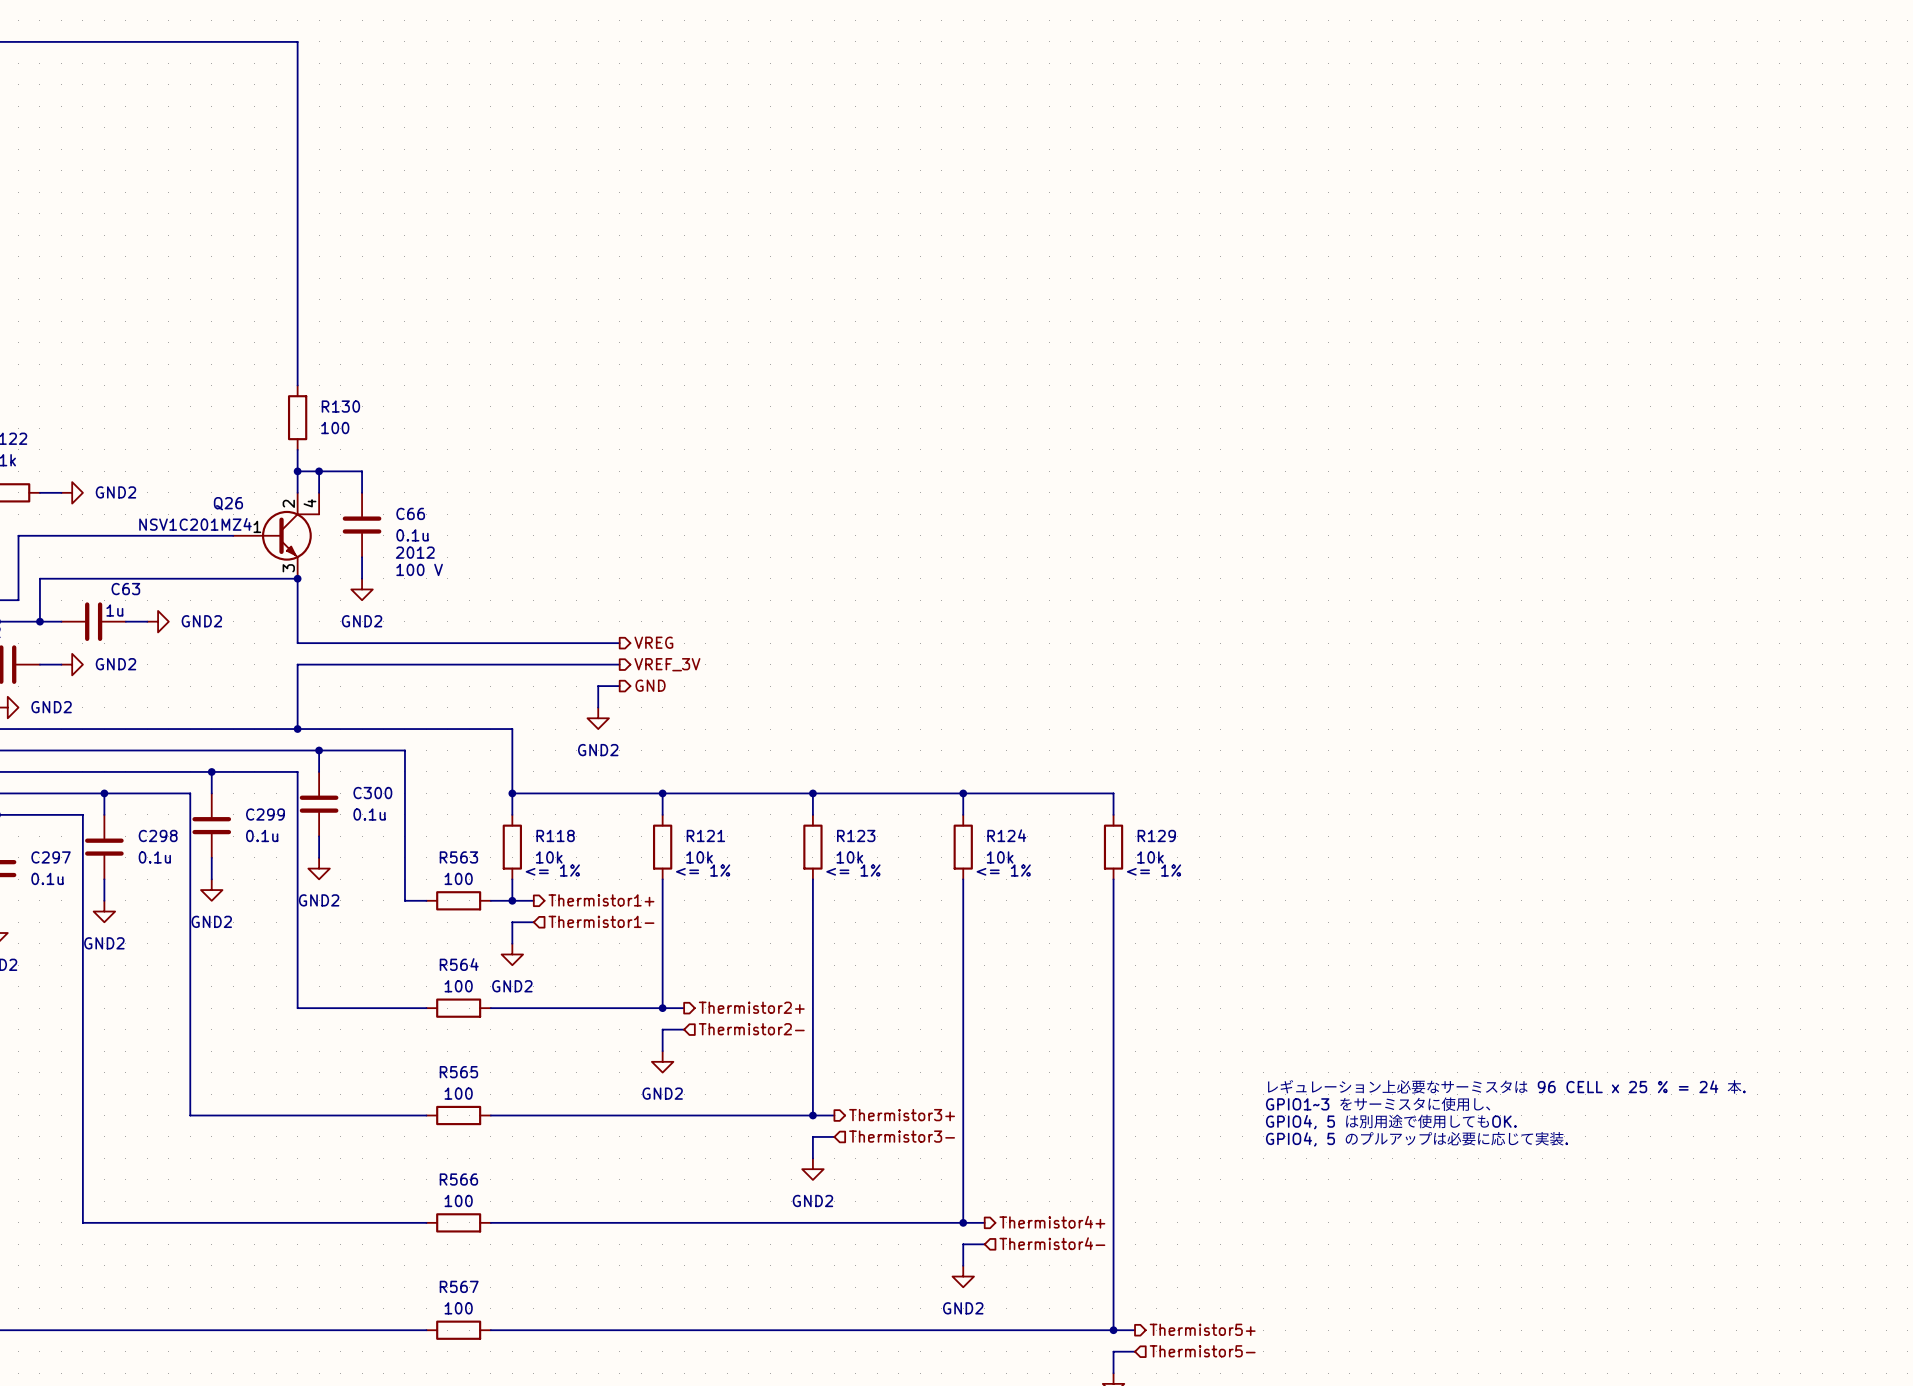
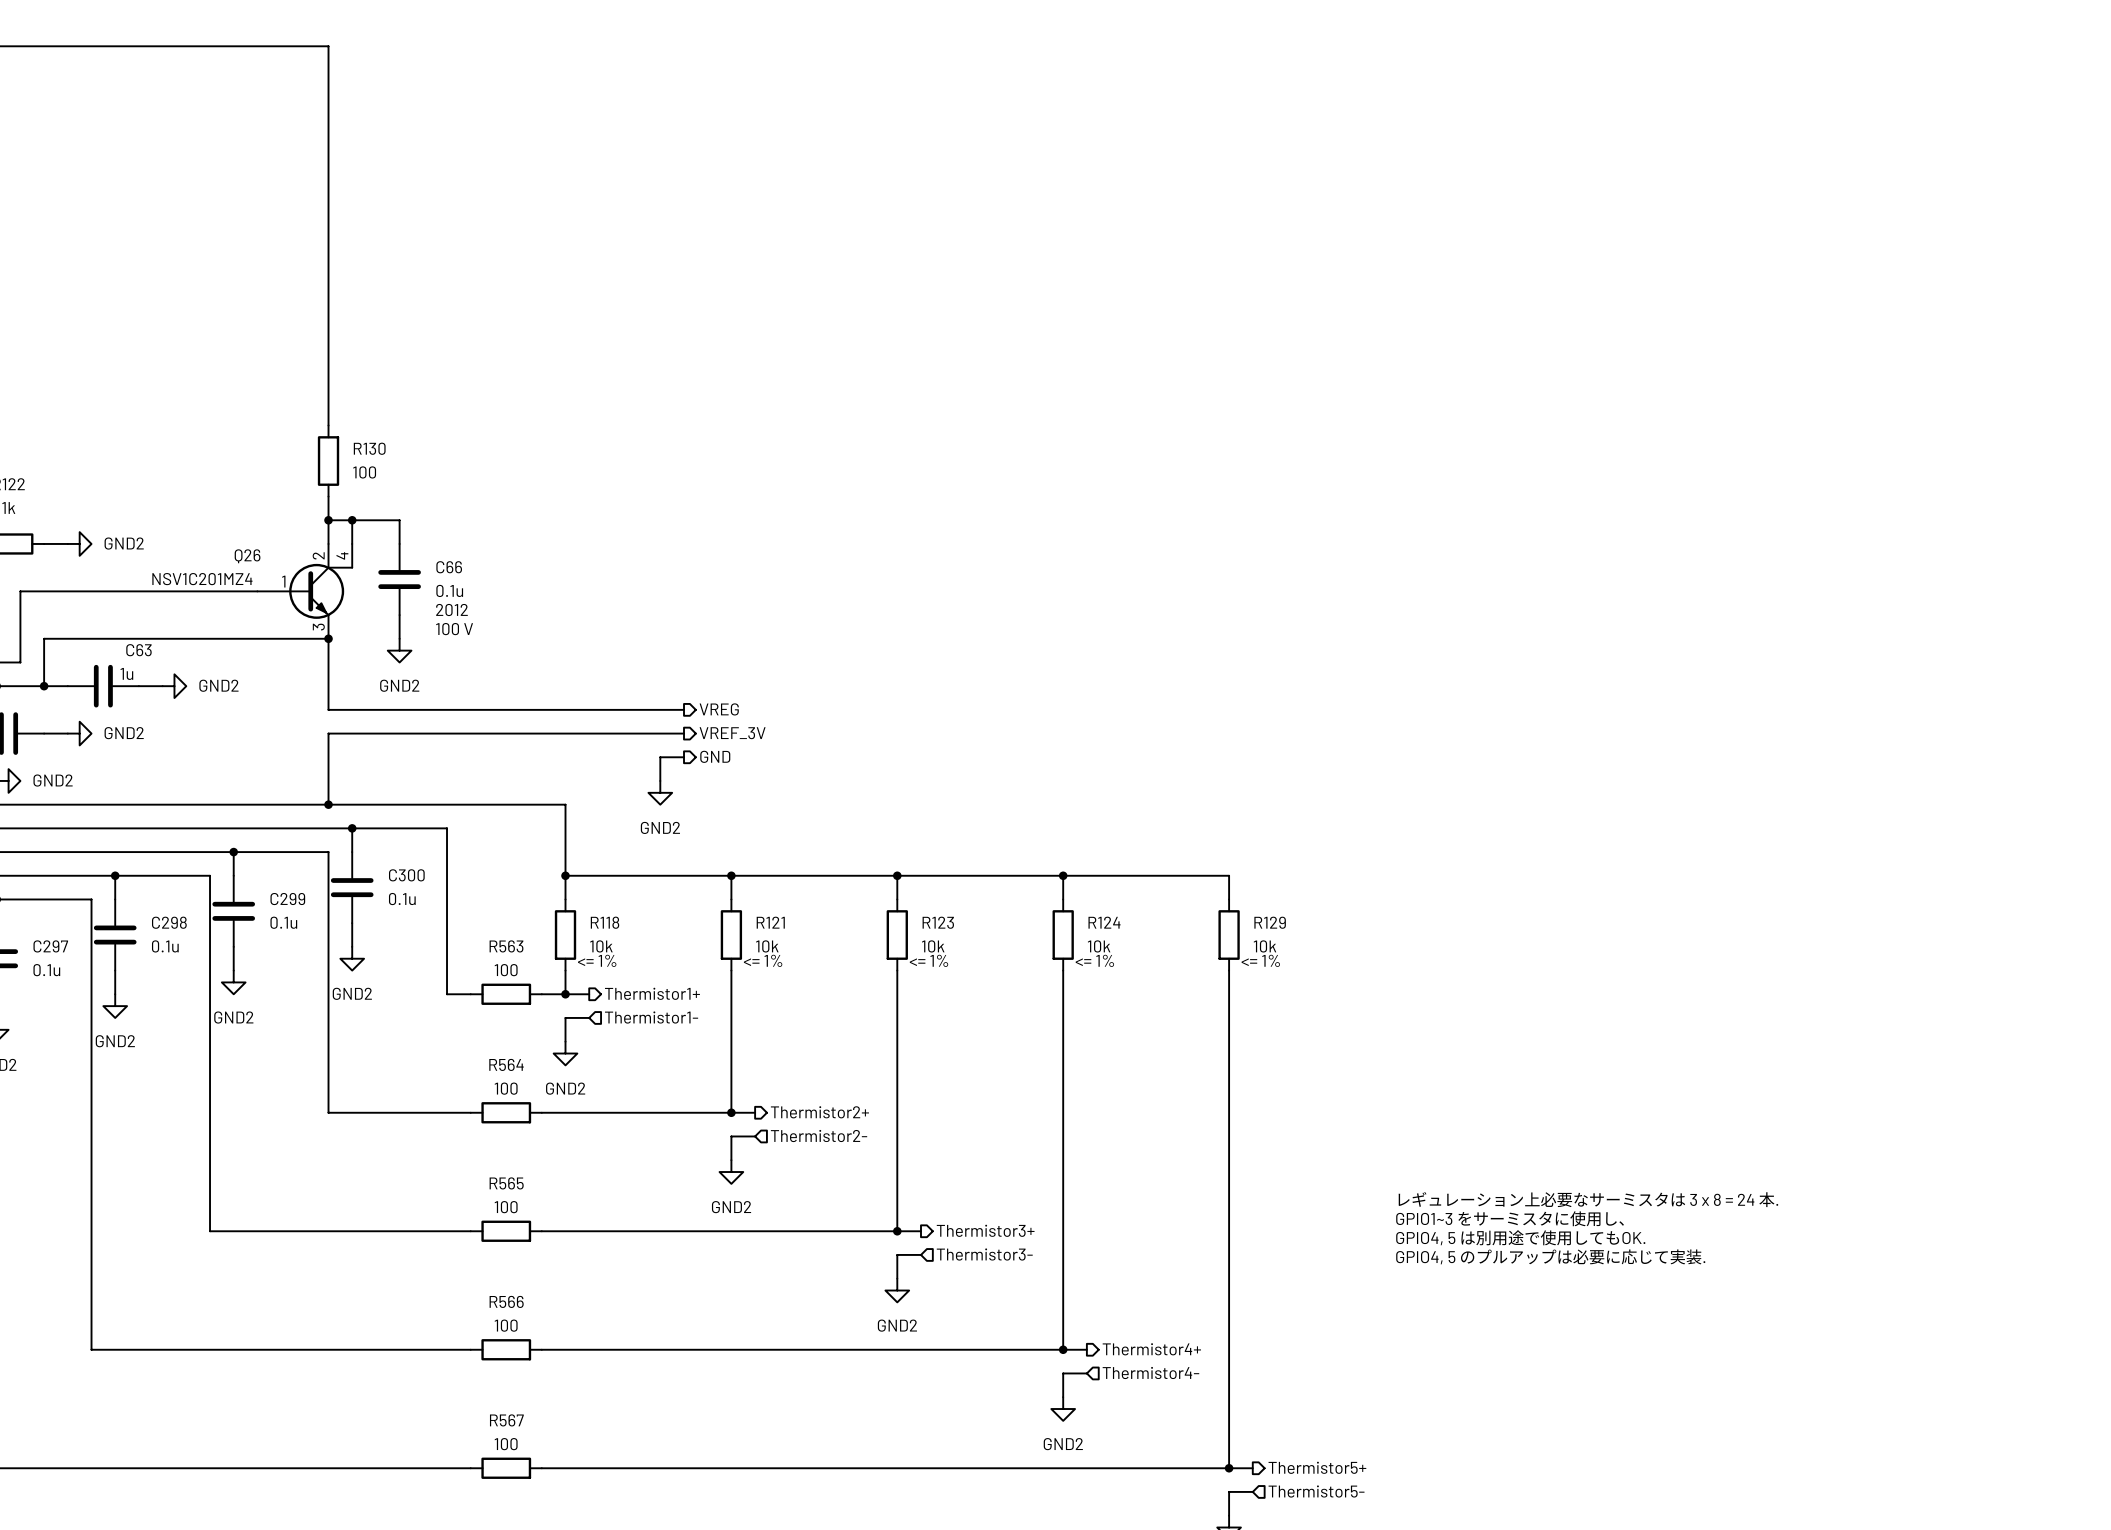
text: レギュレーション上必要なサーミスタは 96 CELL x 25 % = 24 本. (1506, 1086) -> レギュレーション上必要なサーミスタは 3 x 8 = 24 本. (1588, 1199)

